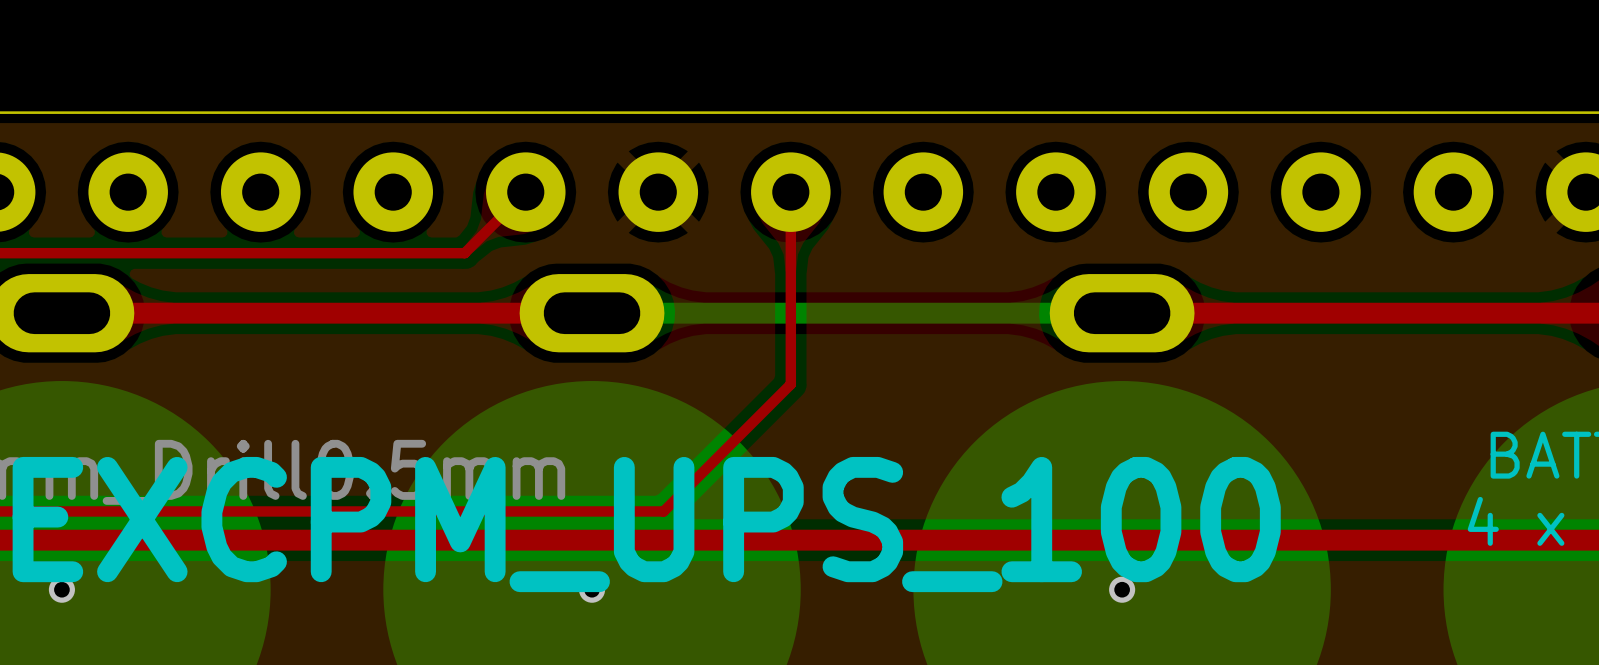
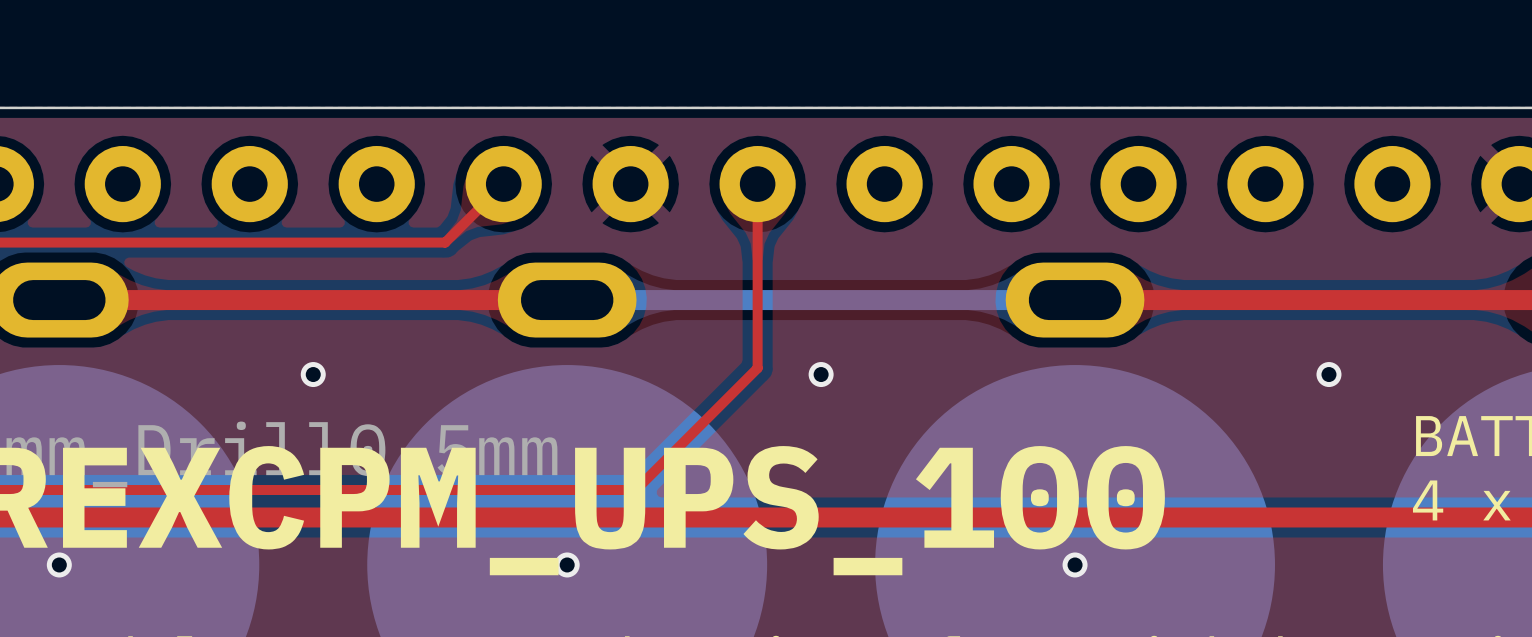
via: none -> (313, 374)
via: none -> (821, 374)
via: none -> (1328, 374)

